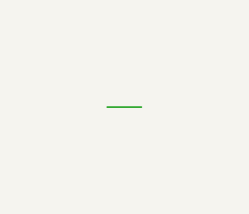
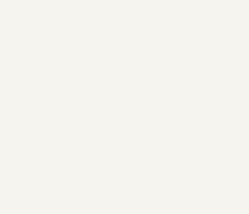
wire: (107, 107) (141, 107) -> none

